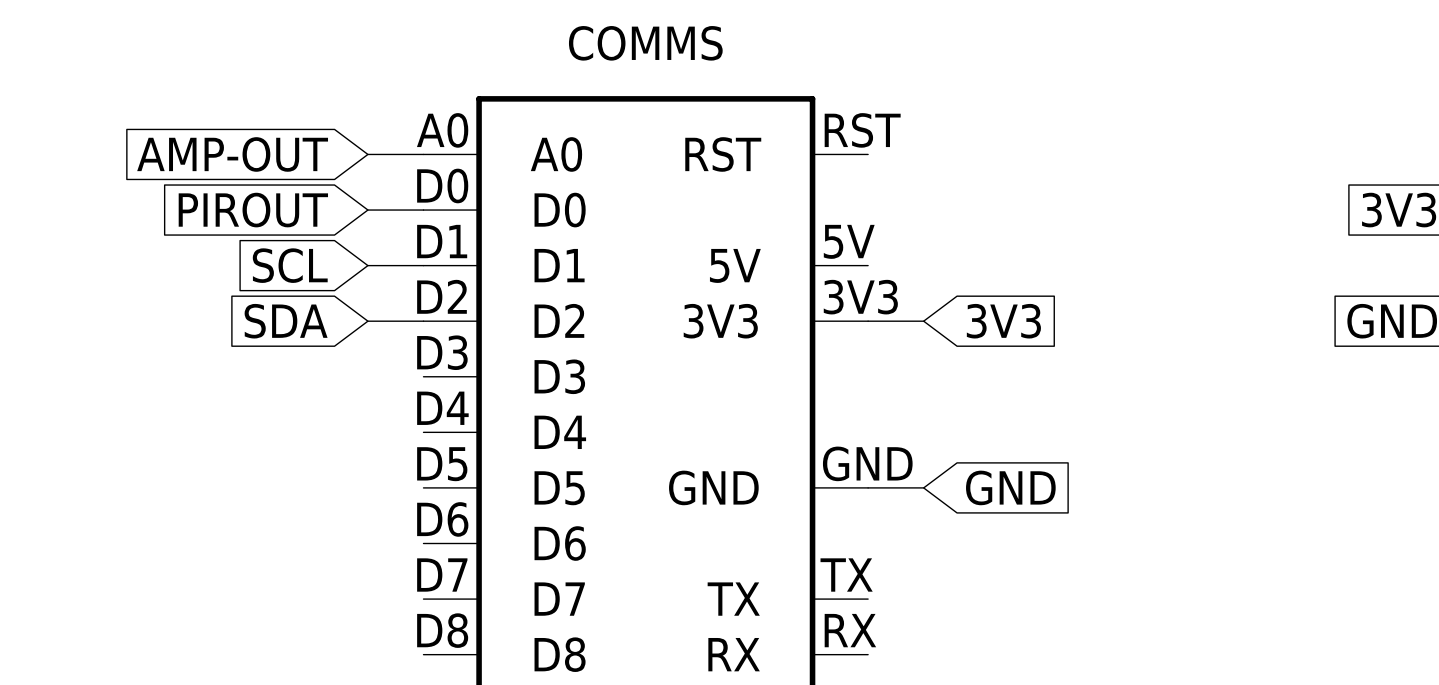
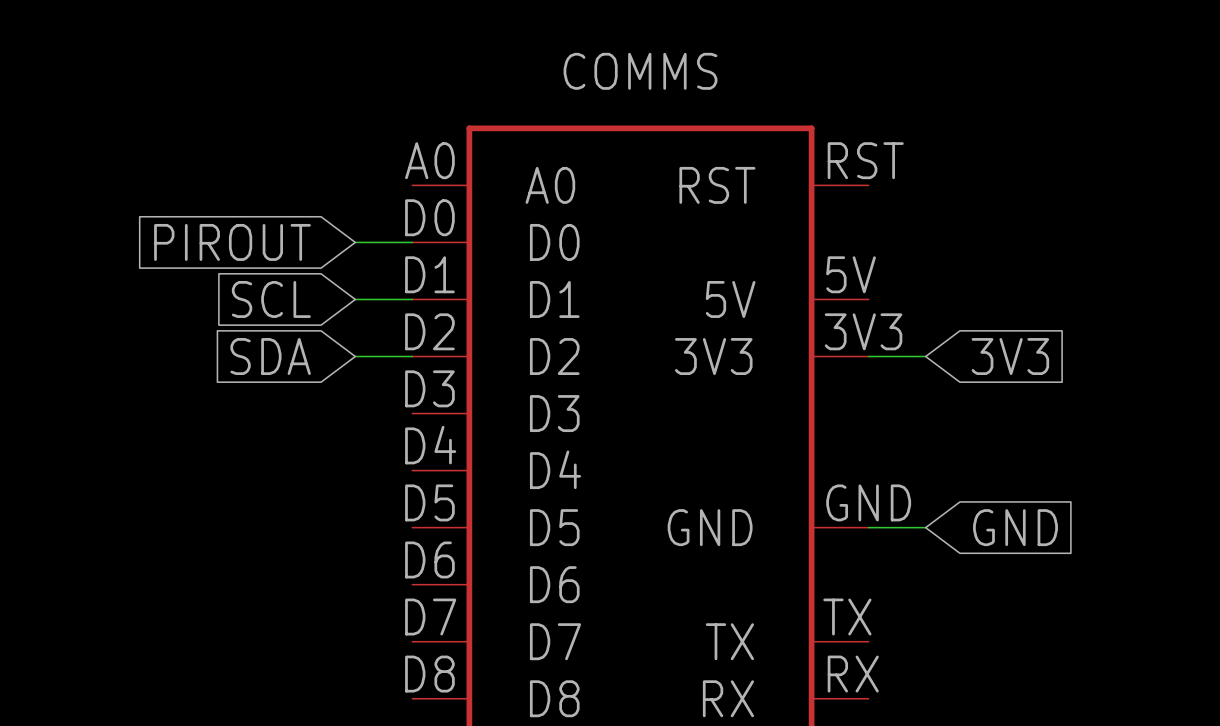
global label: AMP-OUT (232, 154) -> none
wire: (367, 154) (423, 154) -> none

